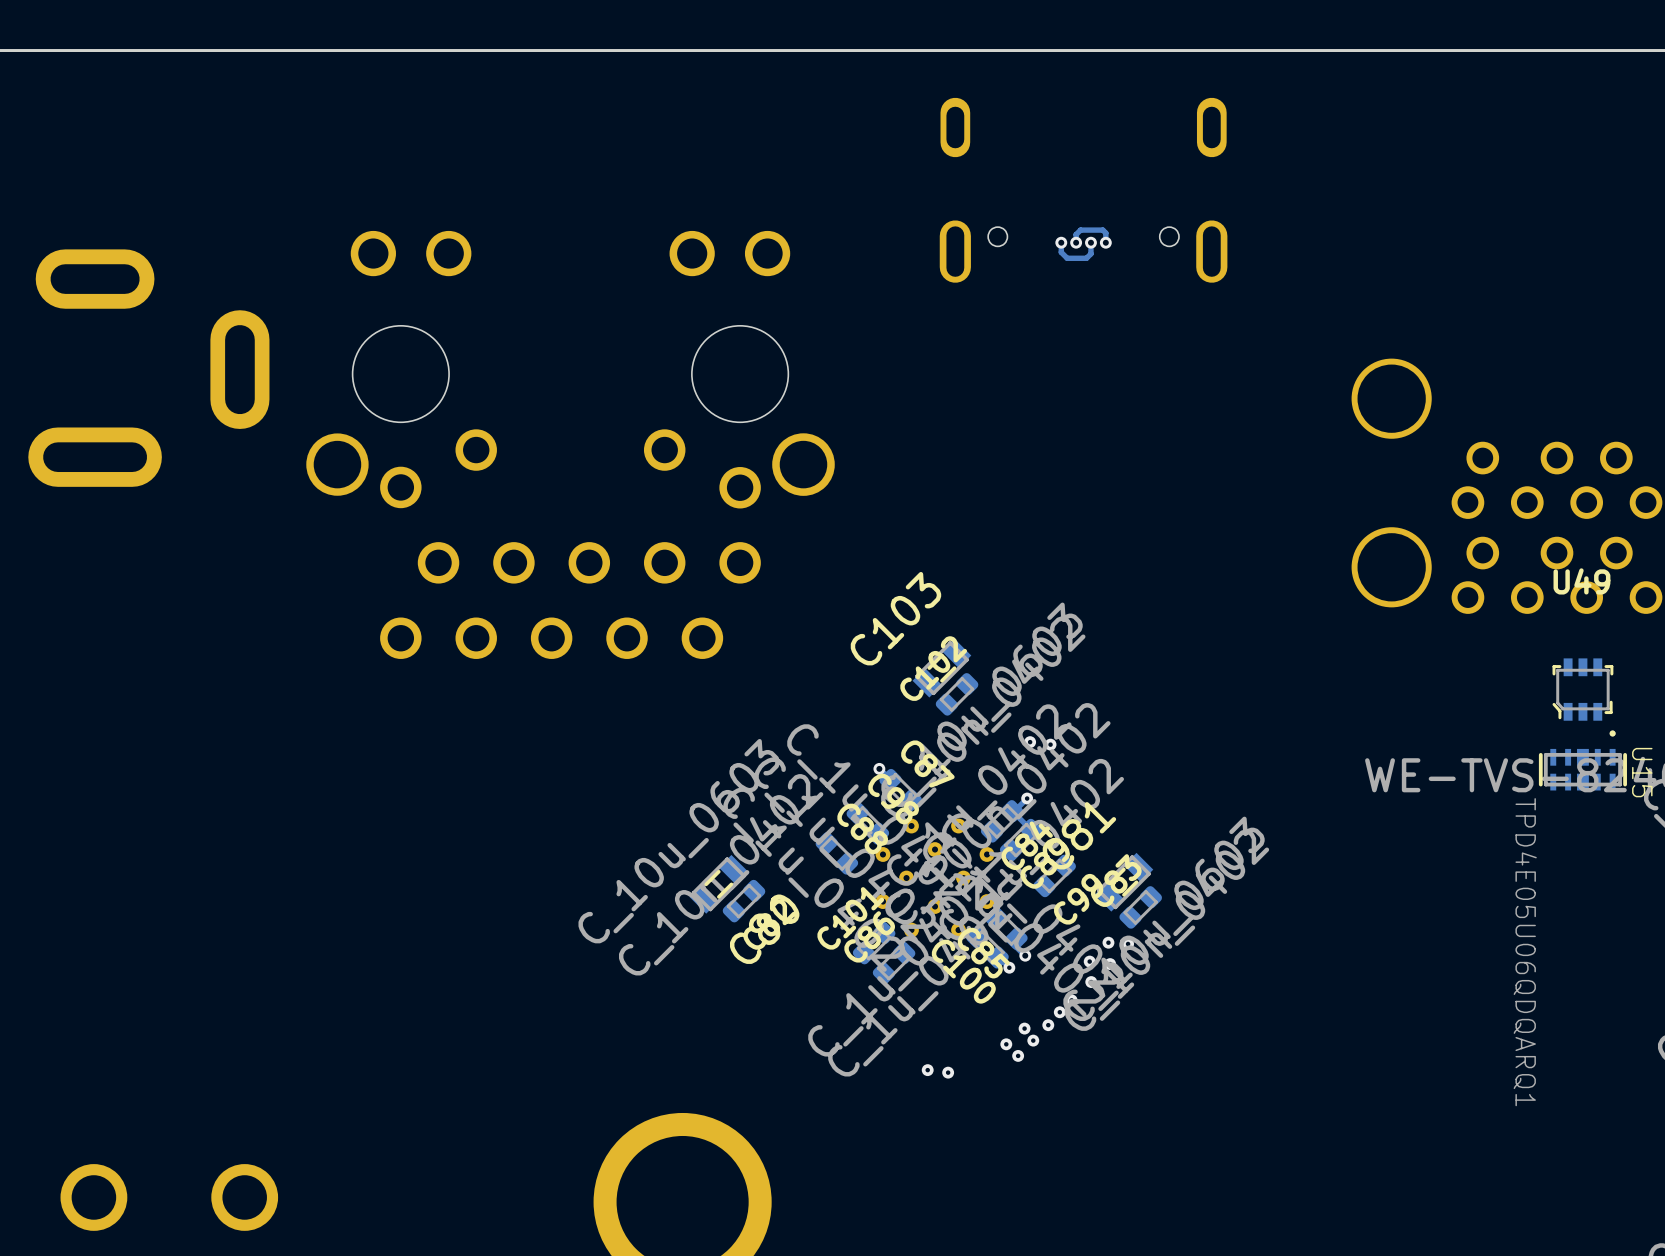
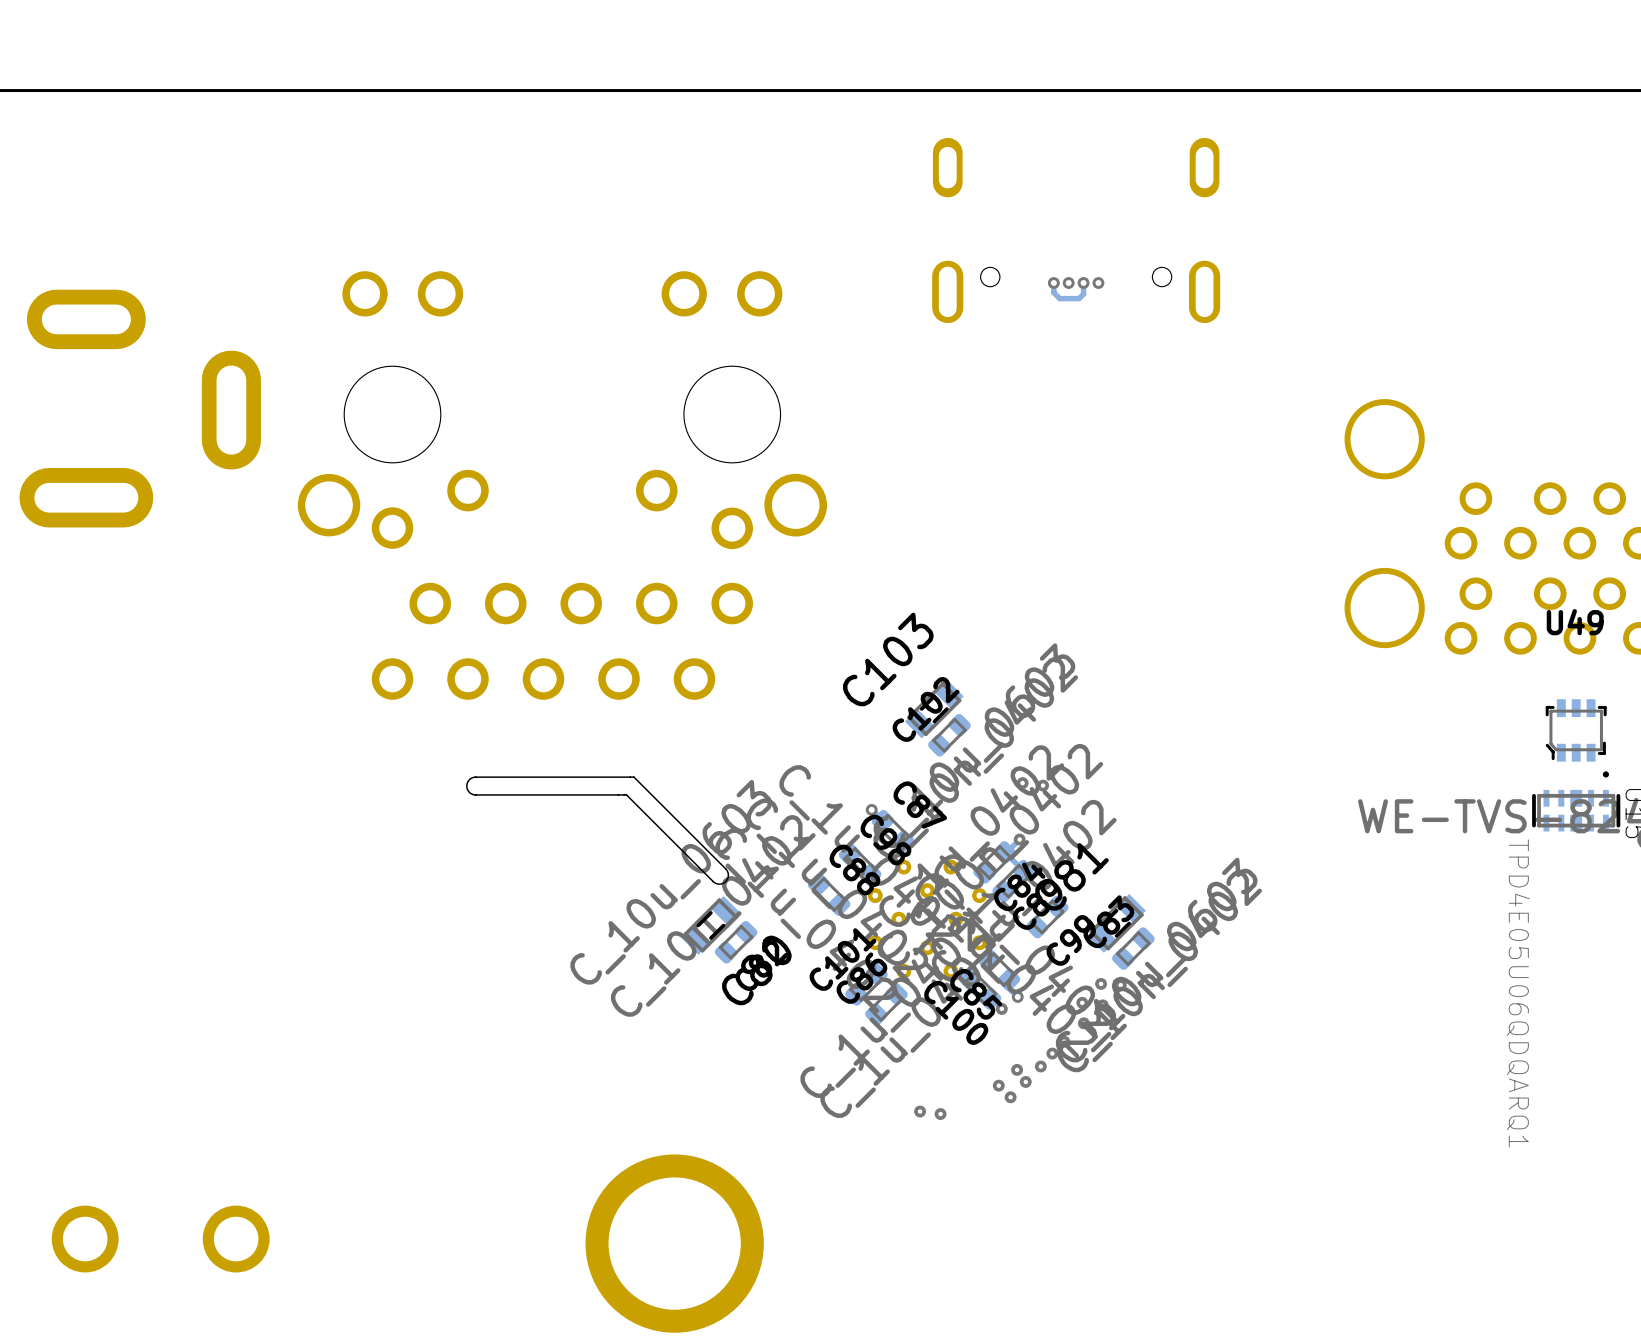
track: (1105, 242) (1105, 233) (1102, 230) (1080, 230) (1076, 234) (1076, 242) -> none
board edge: none -> (634, 777) (475, 777) (469, 779) (466, 786) (469, 792) (475, 794) (626, 794) (713, 881) (719, 884) (724, 882) (728, 876) (726, 869) (634, 777)

